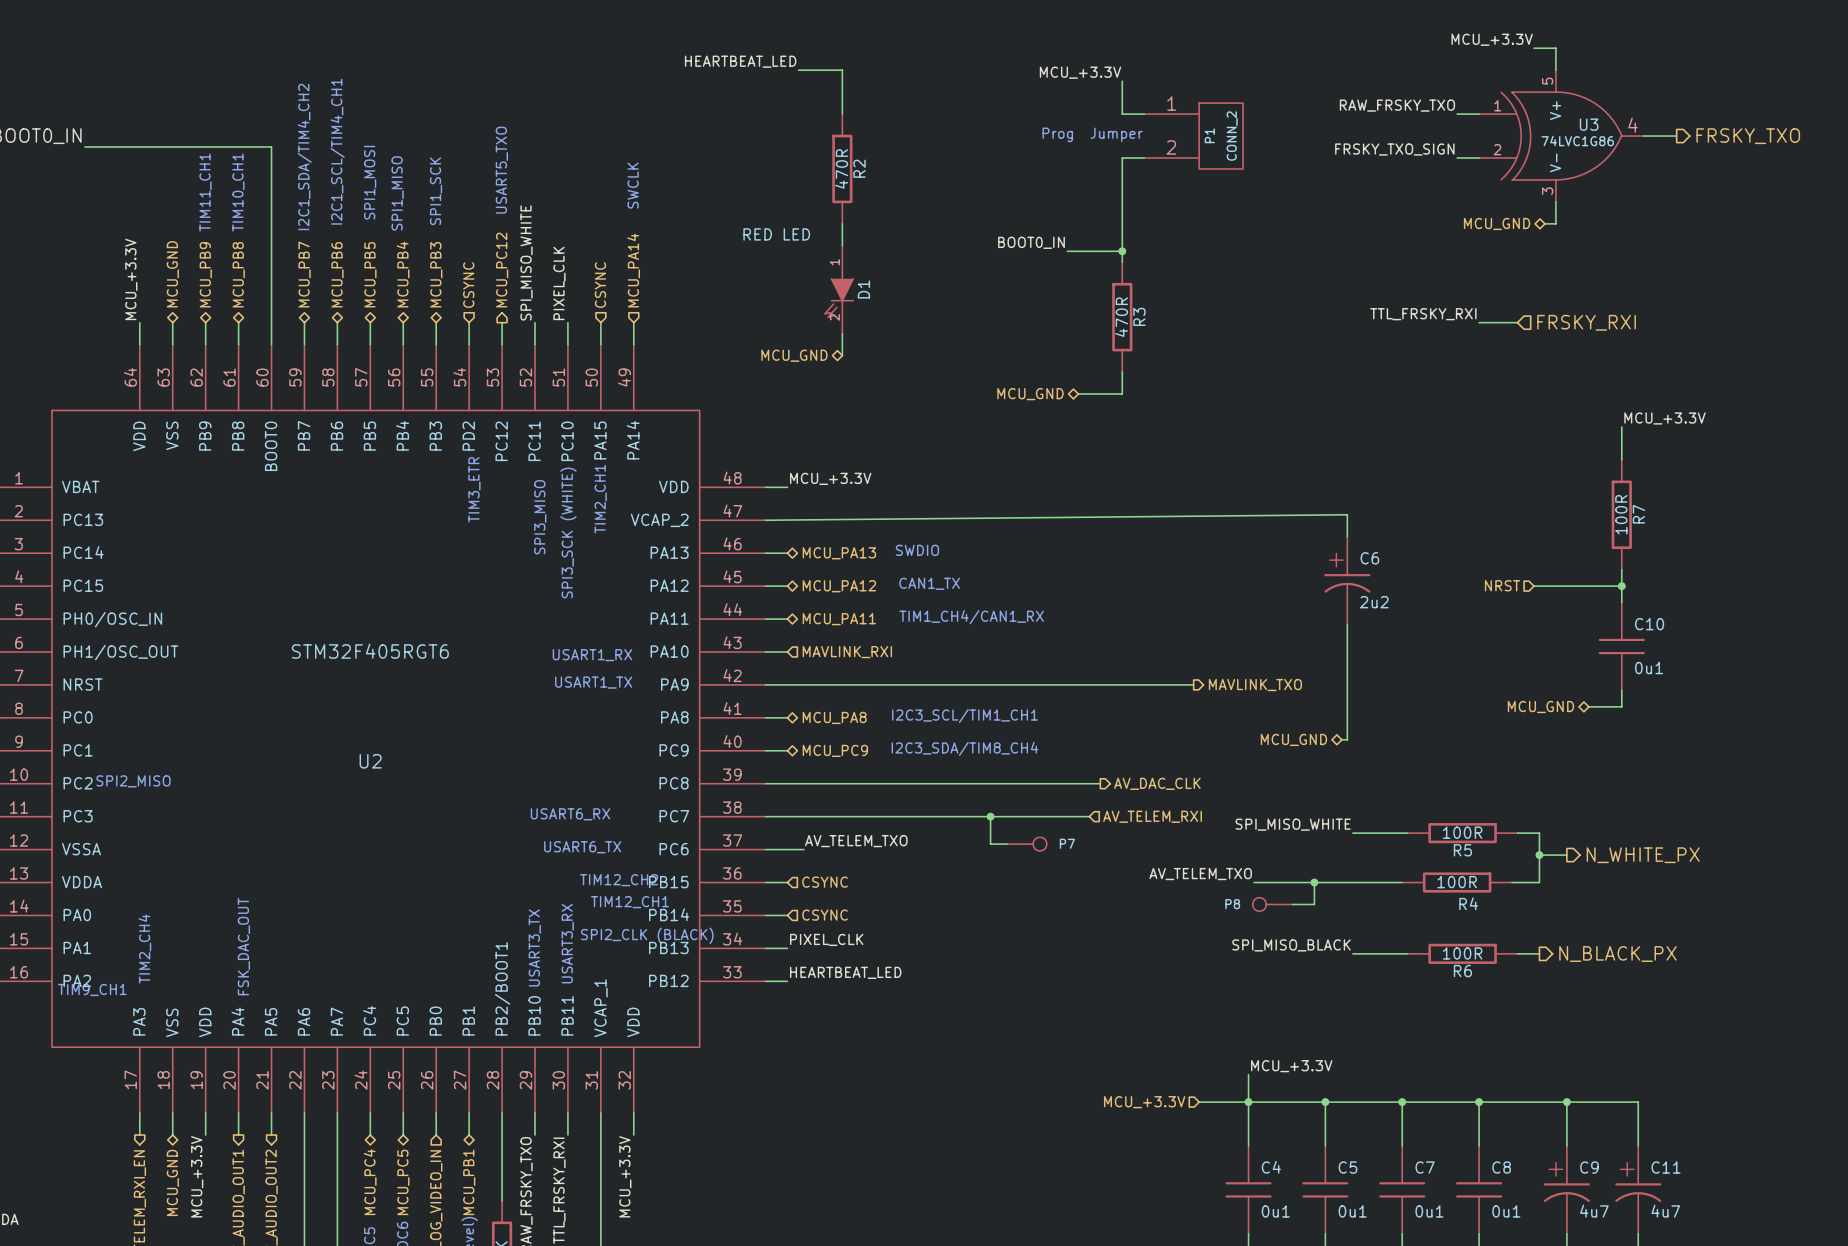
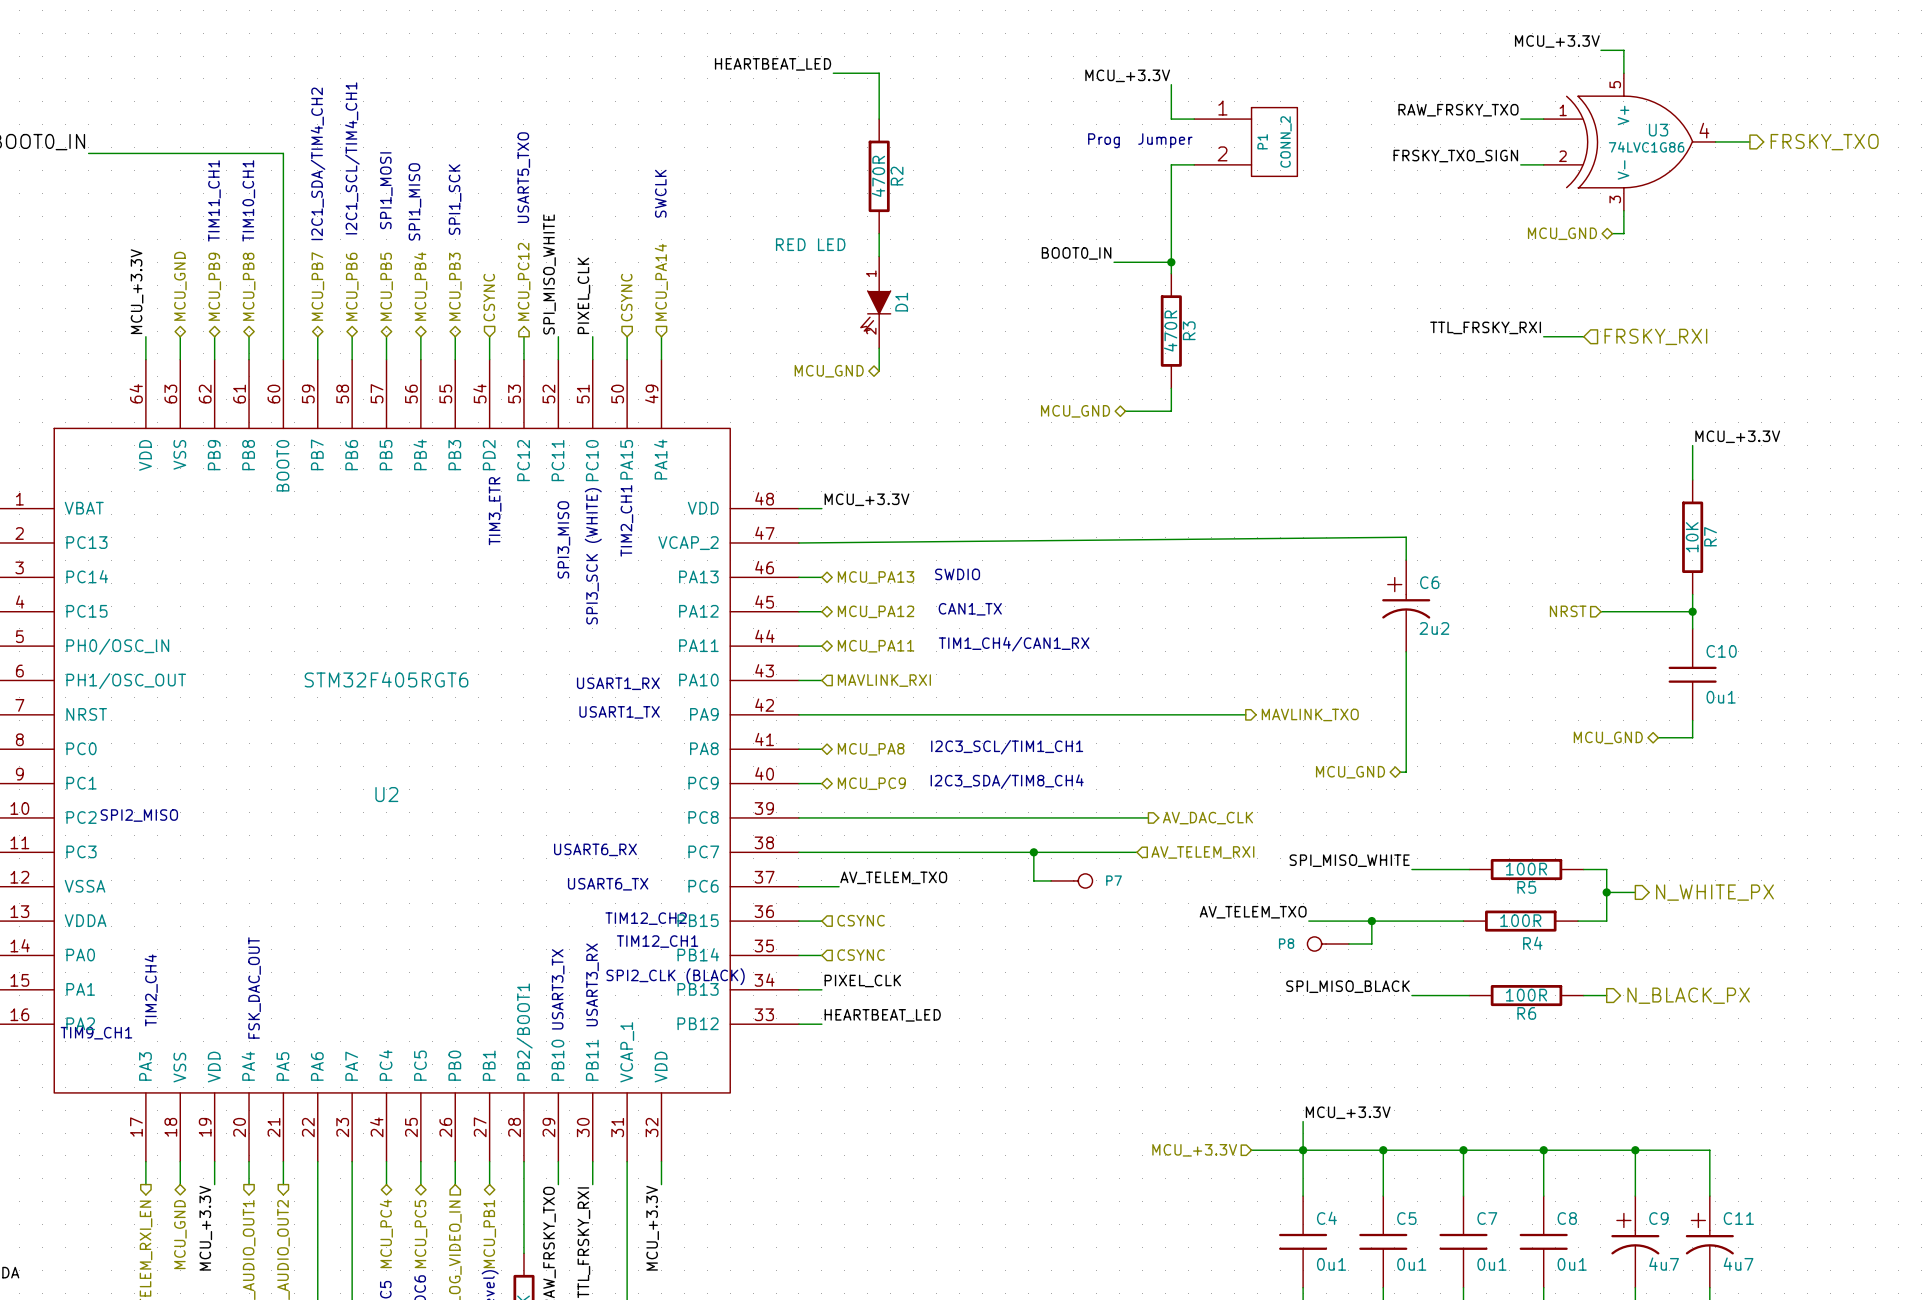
R7 value: 100R (1621, 514) -> 10K (1692, 537)

